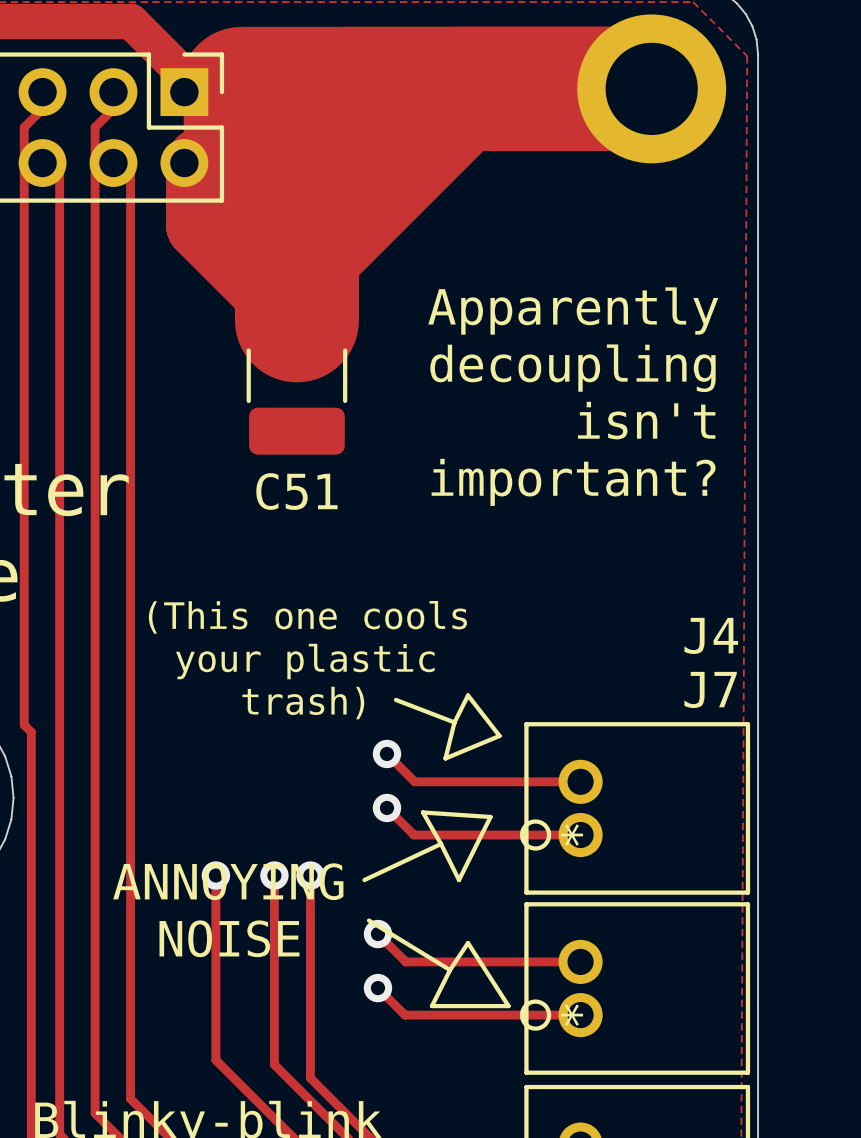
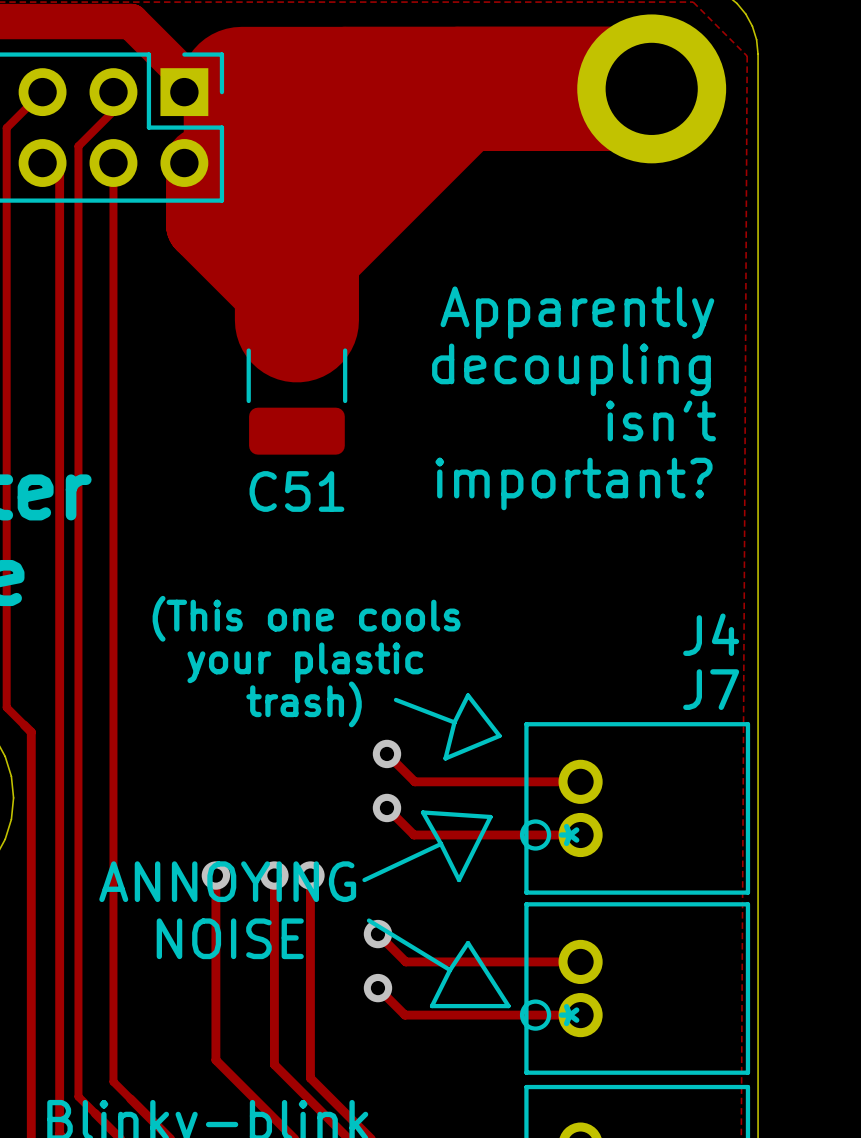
track: (59, 91) (24, 127) (24, 725) -> (42, 92) (6, 128) (6, 707) (24, 725)
track: (130, 91) (95, 127) (95, 1113) -> (113, 92) (113, 111) (78, 146) (78, 1096) (95, 1113)
track: (130, 162) (130, 1098) -> (113, 163) (113, 1081) (130, 1098)

